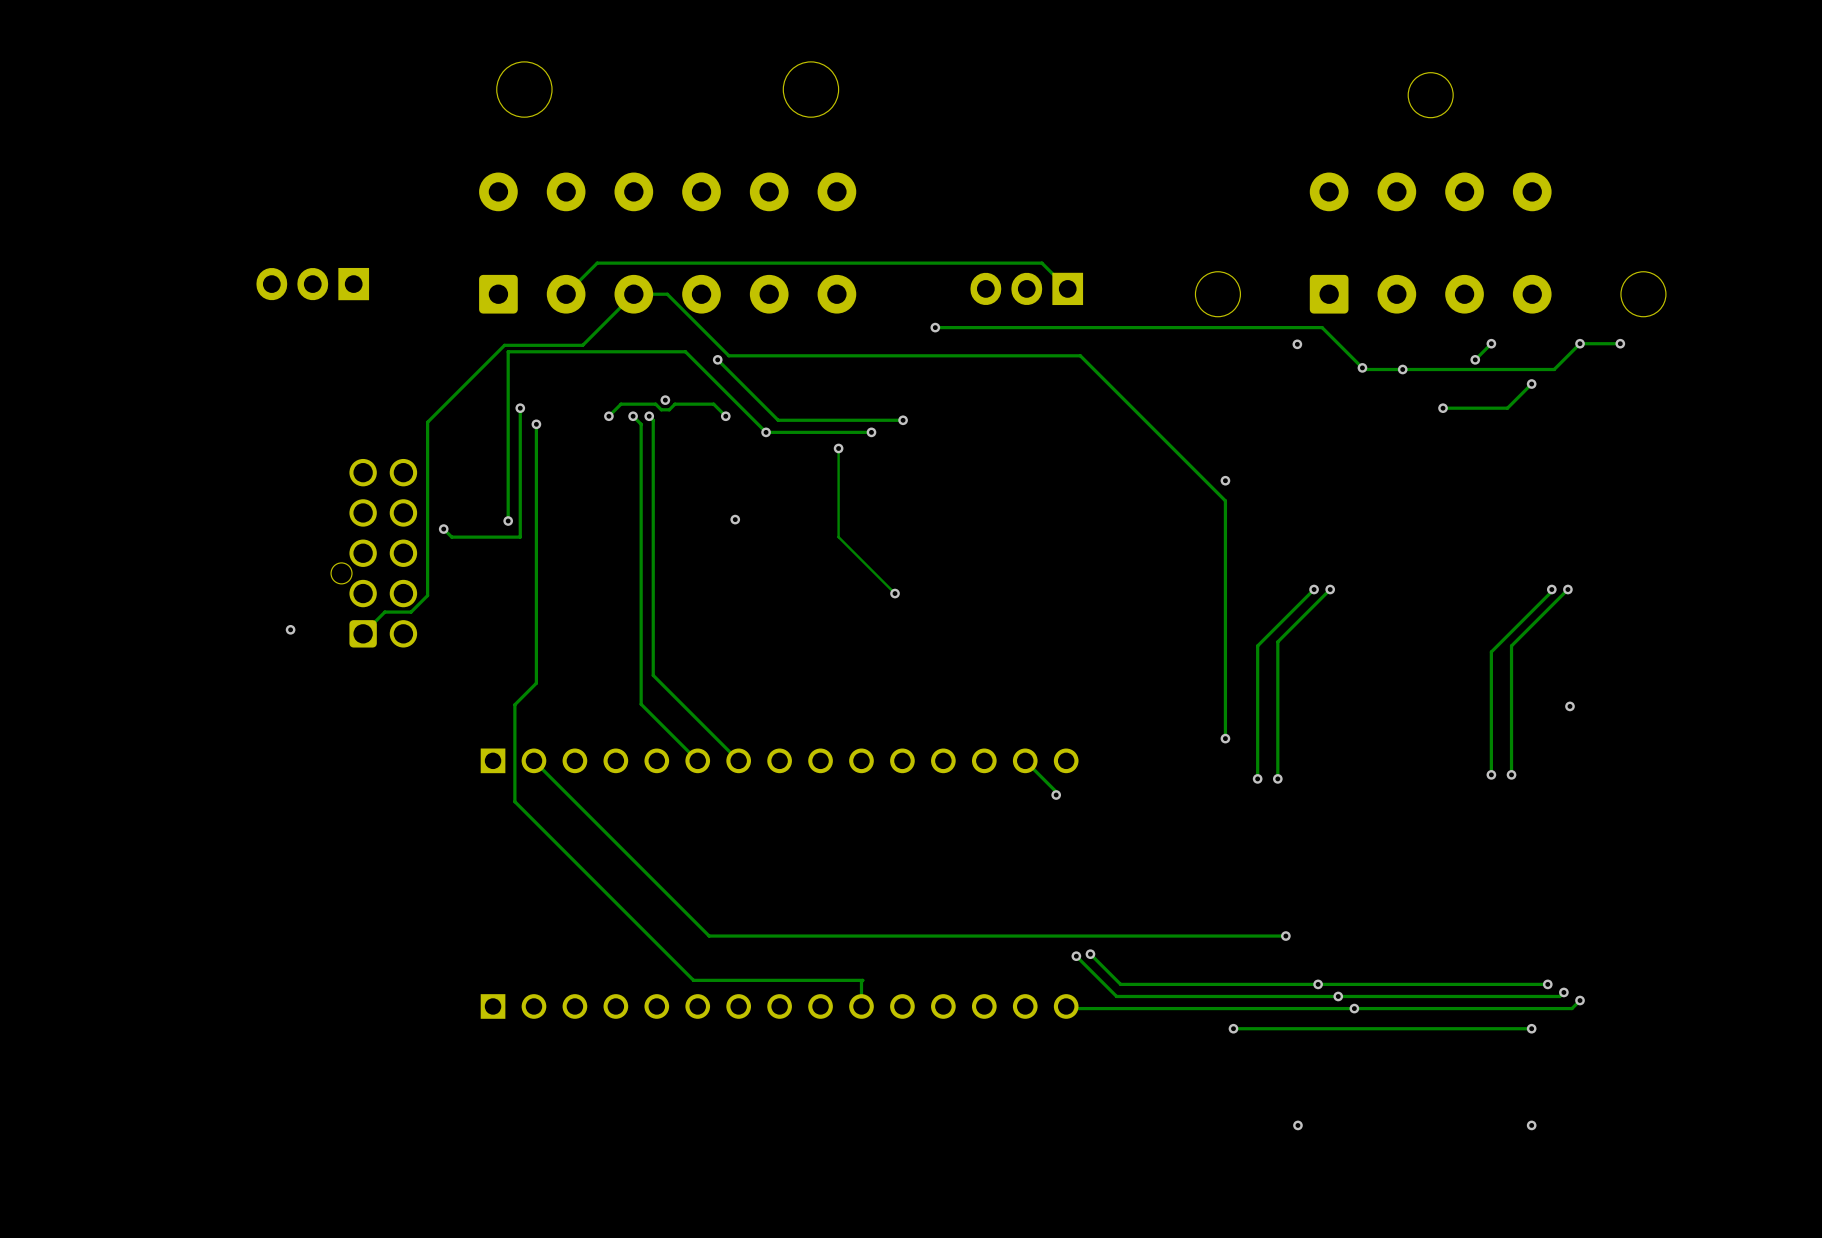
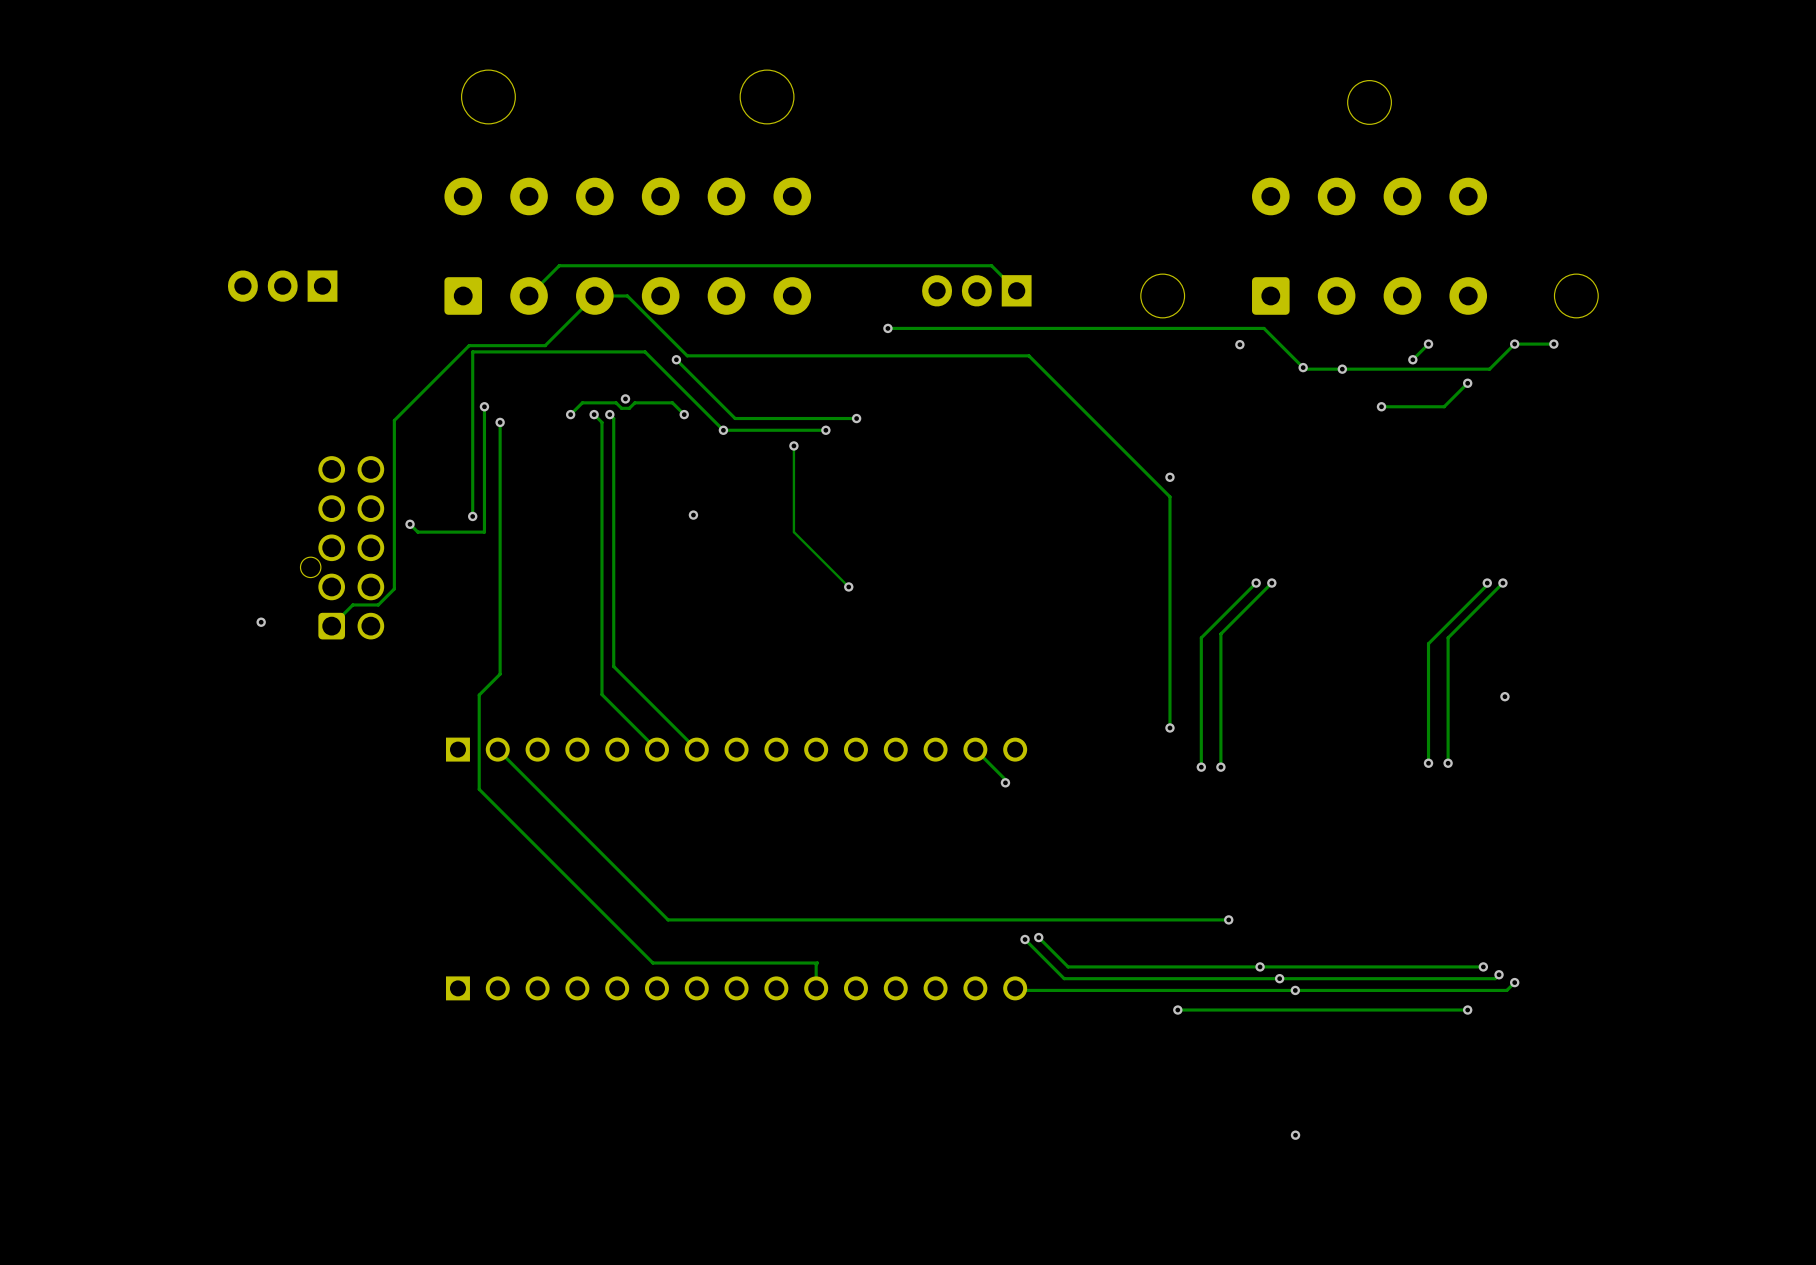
via position: (1297, 1125) -> (1295, 1135)
via: (1531, 1125) -> none

